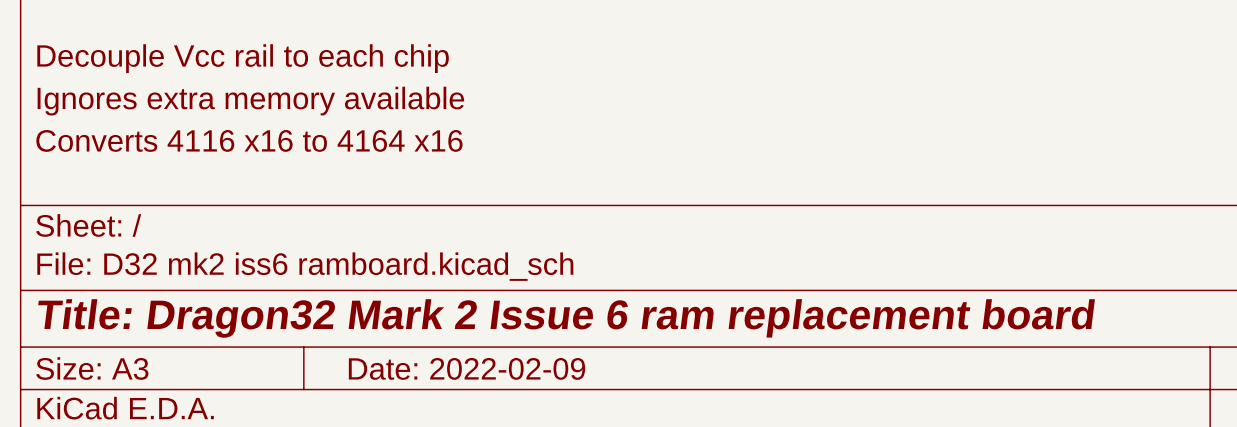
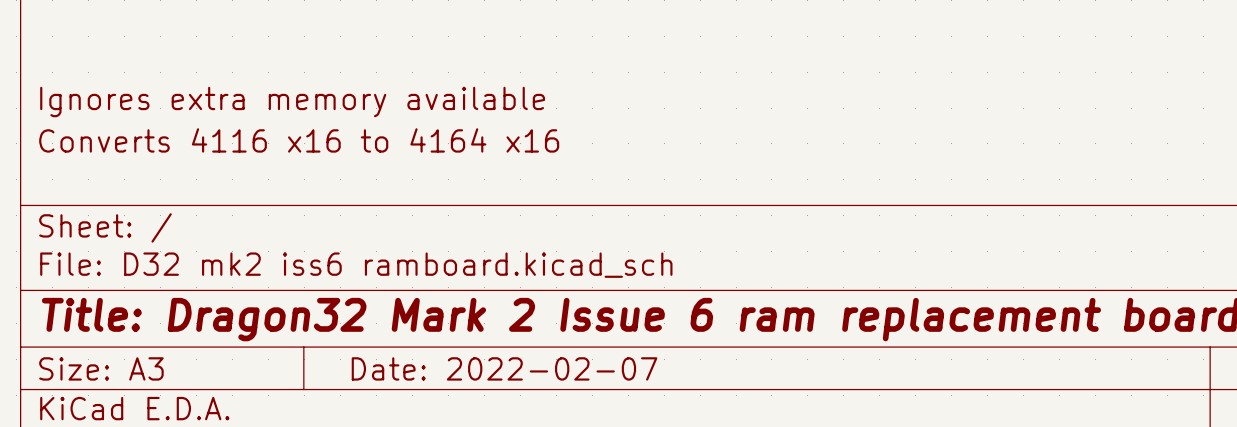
title block: Decouple Vcc rail to each chip (243, 58) -> none
title block: Date: 2022-02-09 (467, 368) -> Date: 2022-02-07 (504, 368)

